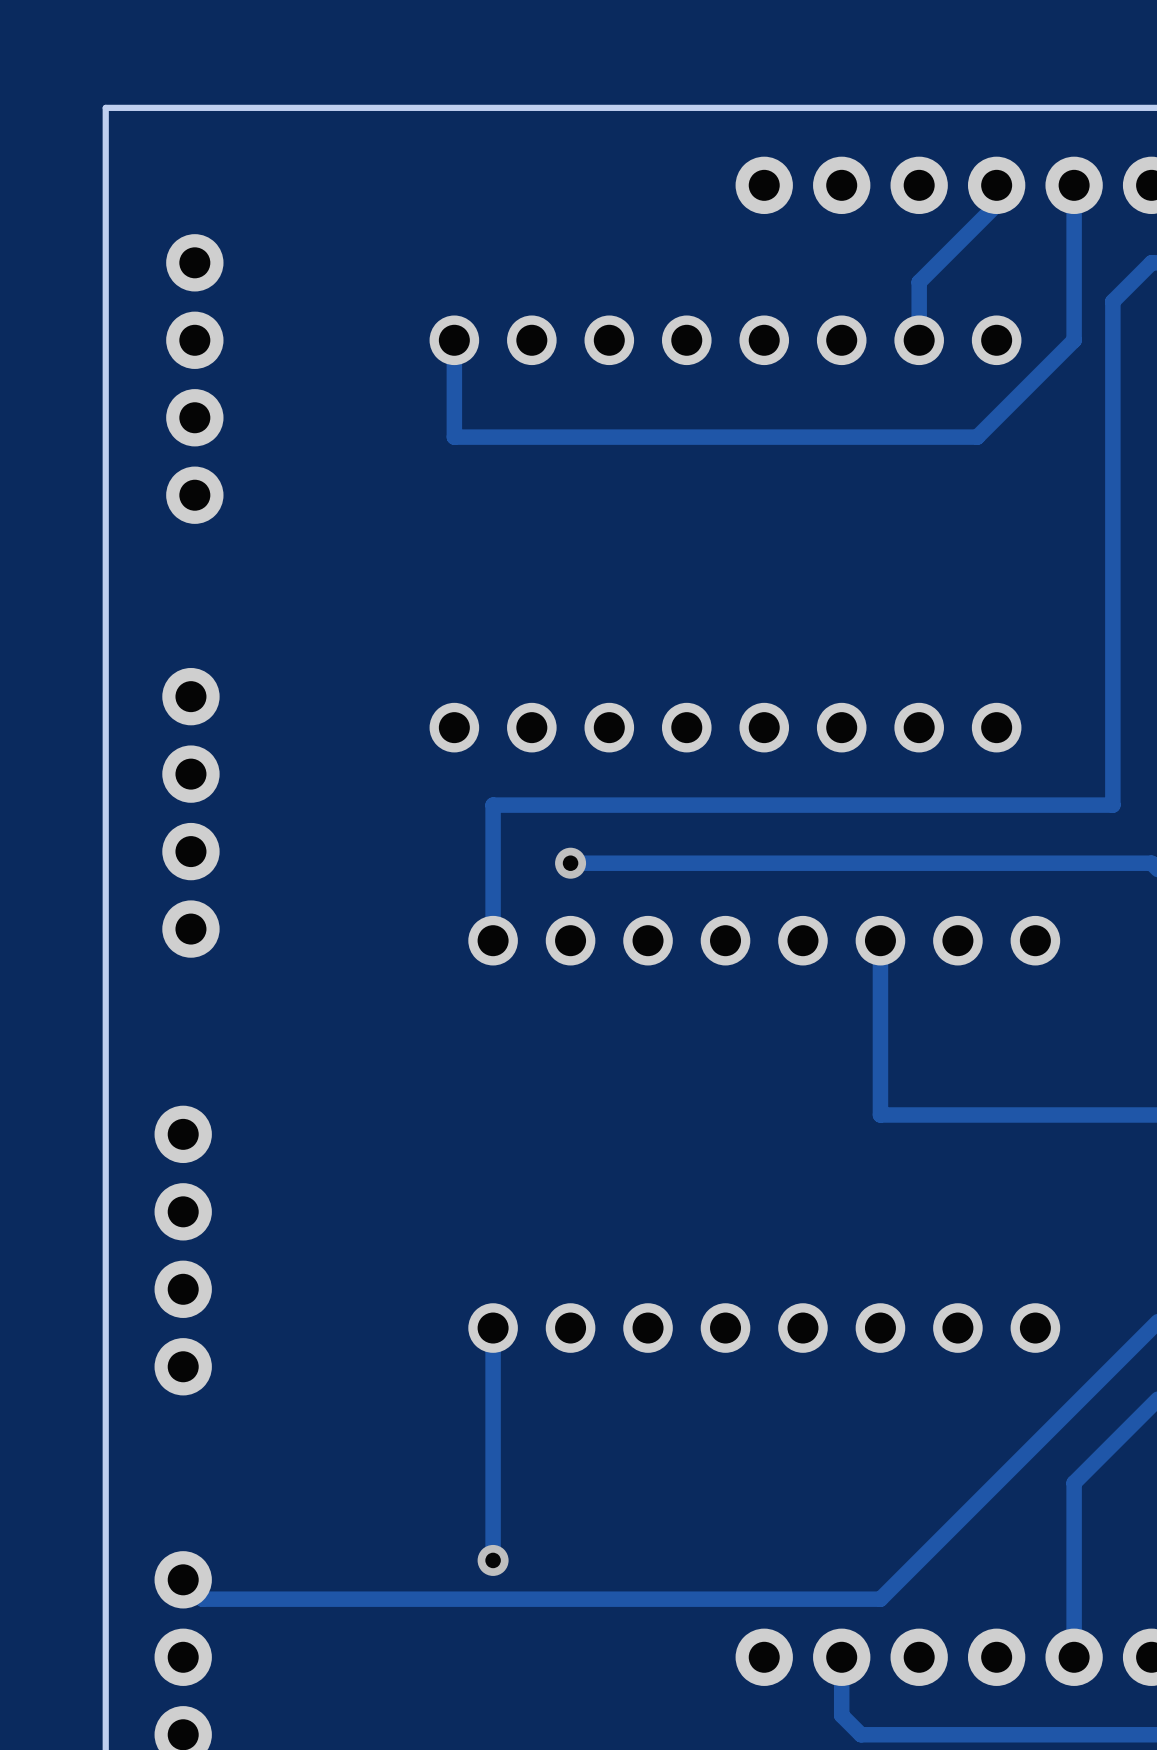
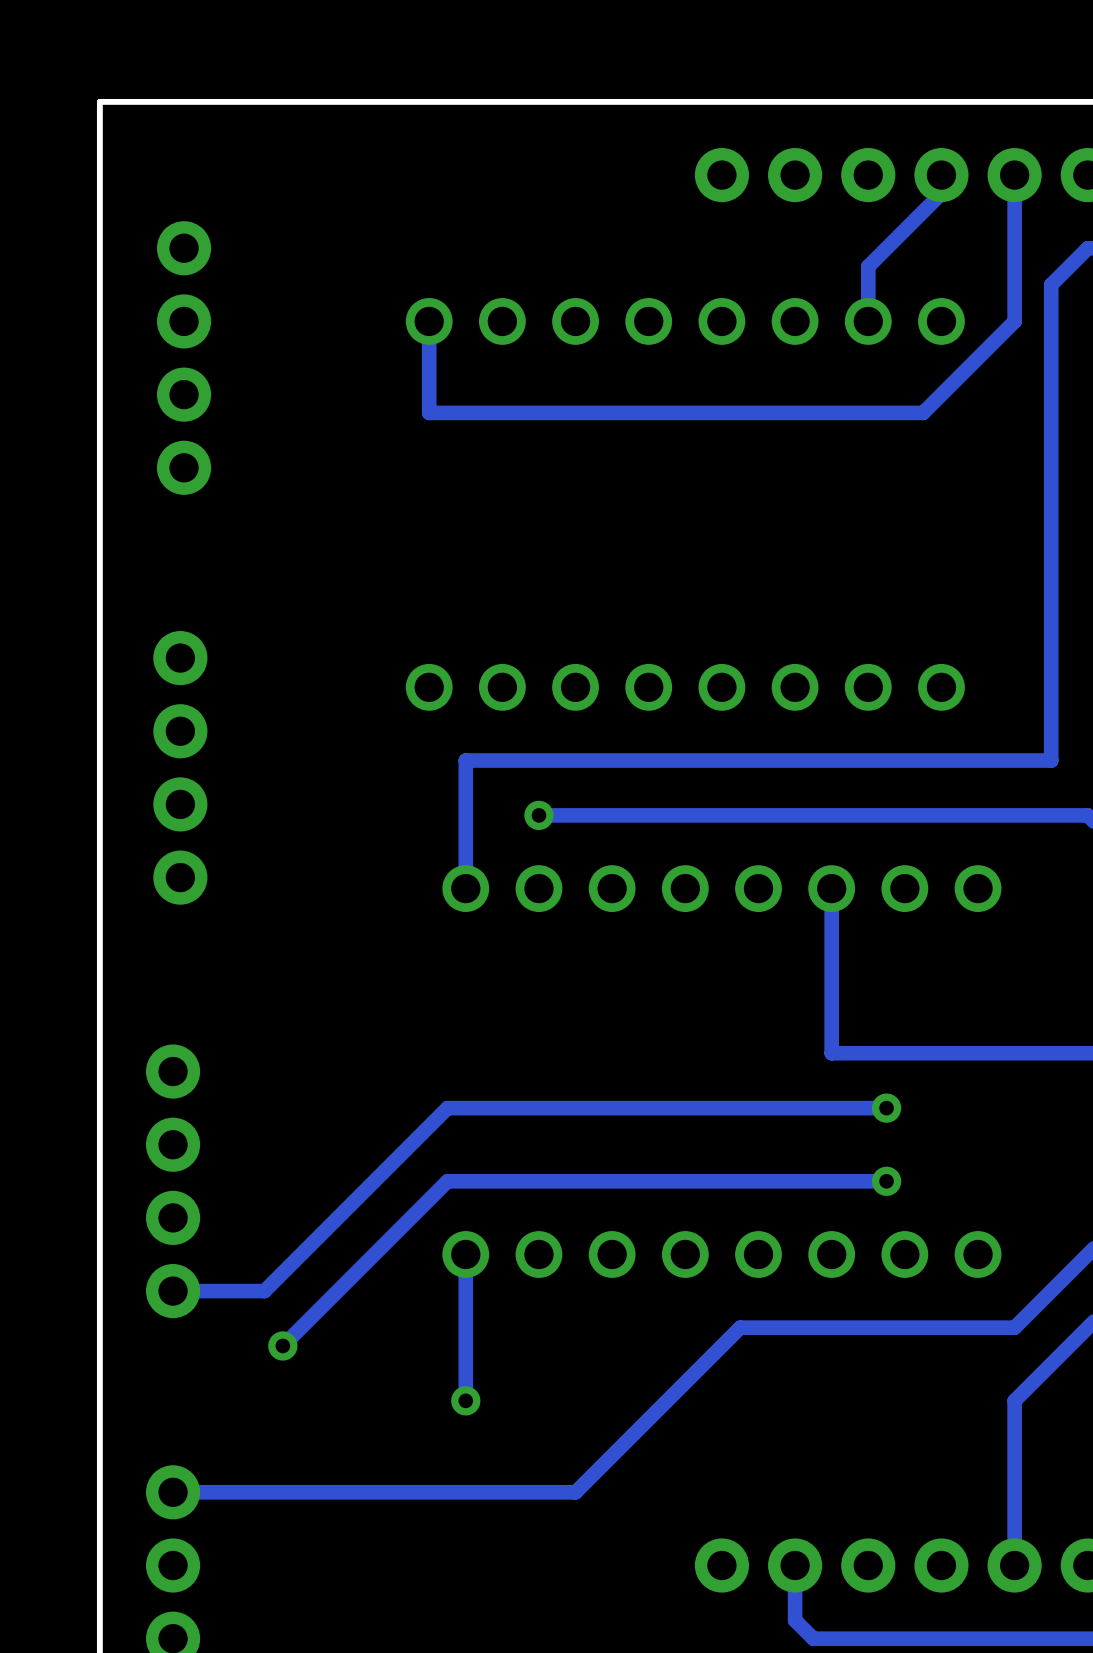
track: none -> (886, 1108) (447, 1108) (264, 1291) (173, 1291)
via: none -> (886, 1108)
track: none -> (886, 1181) (447, 1181) (282, 1345)
via: none -> (886, 1181)
track: (1074, 1405) (880, 1599) (202, 1599) (183, 1579) -> (1014, 1327) (740, 1327) (575, 1492) (173, 1492)
via: none -> (282, 1345)
track: (493, 1482) (493, 1560) -> none
via position: (493, 1560) -> (465, 1400)

